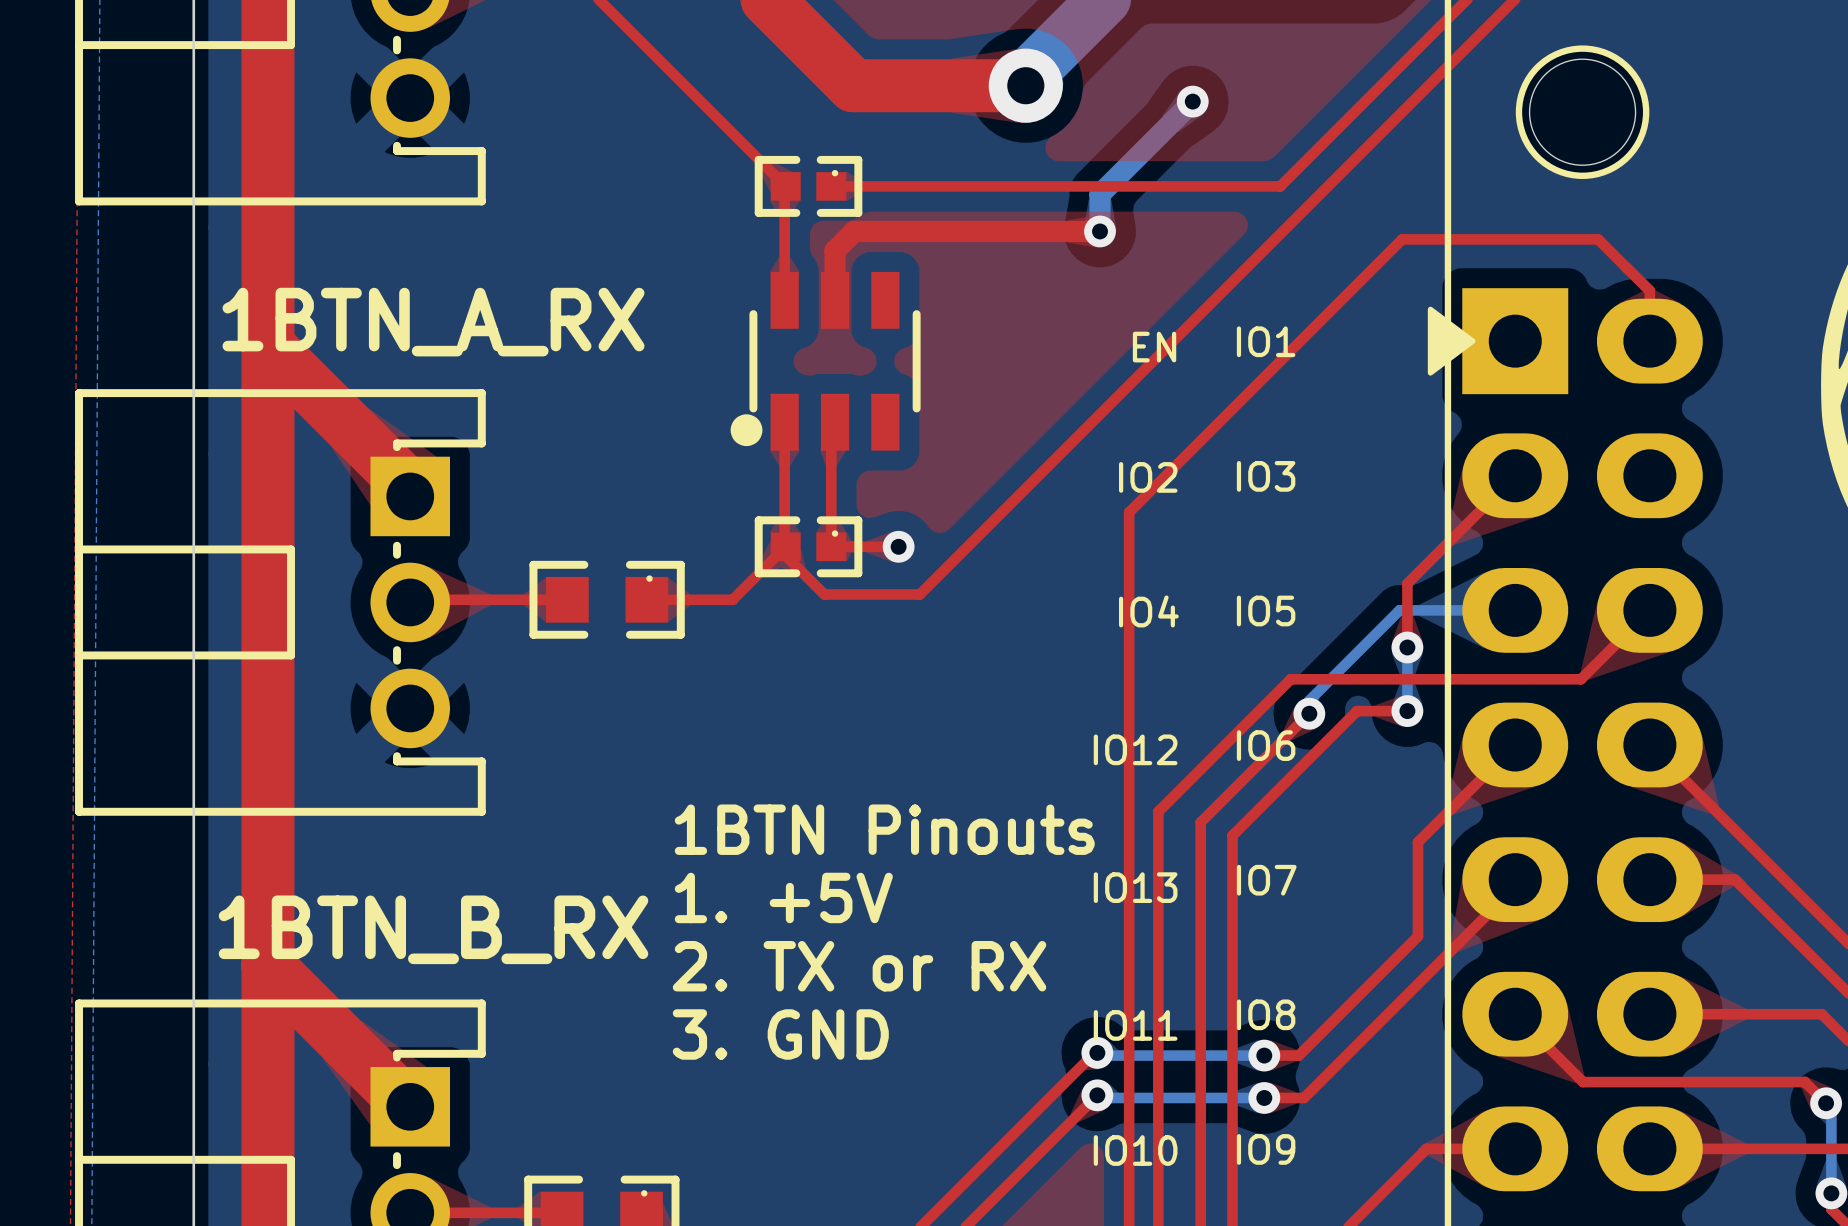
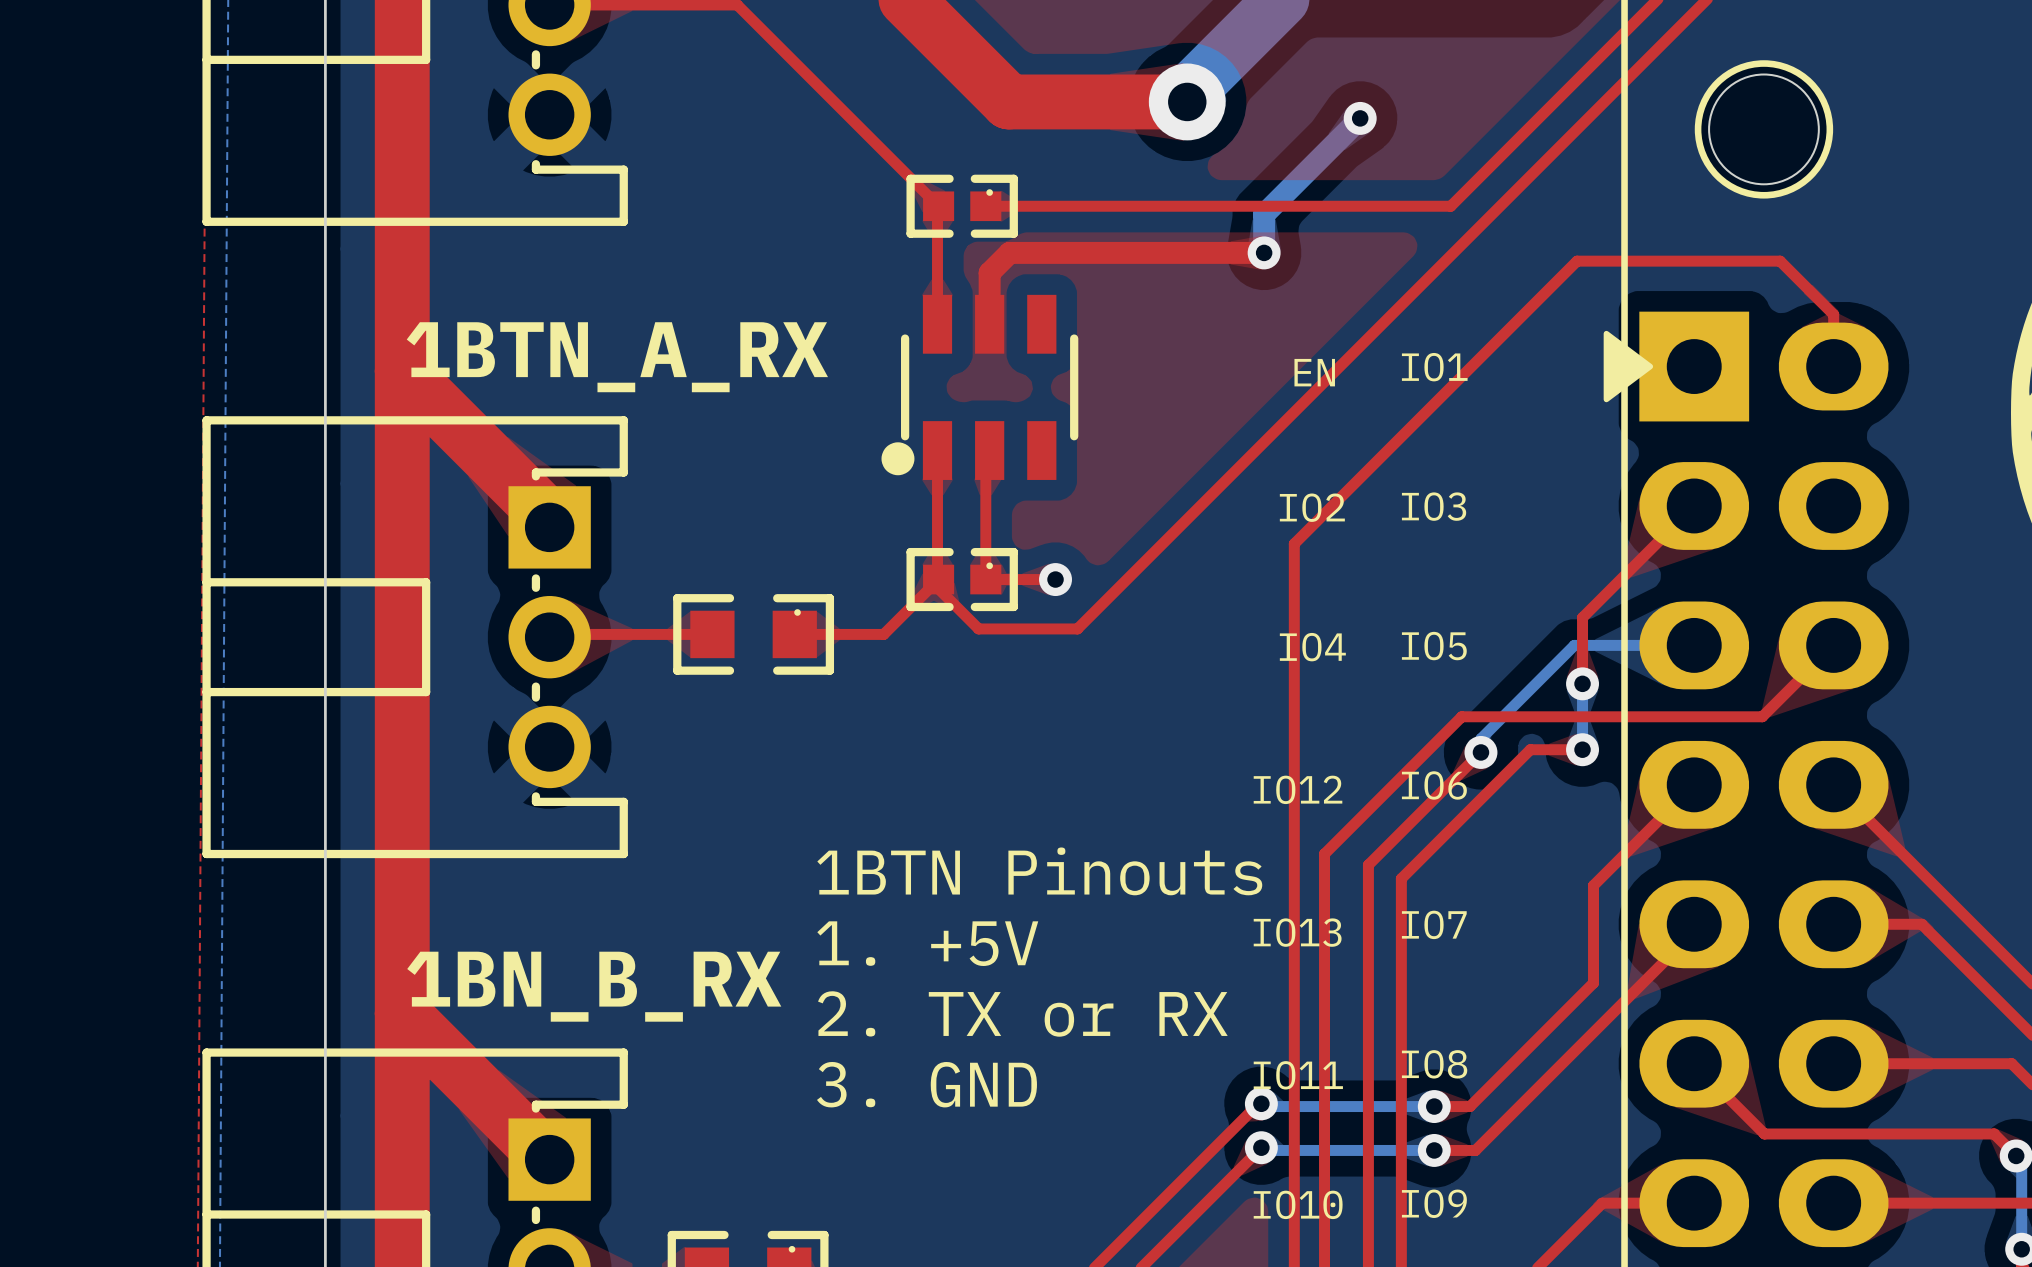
part value position: 1BTN_A_RX (433, 322) -> 1BTN_A_RX (617, 357)
part value: 1BTN_B_RX (433, 929) -> 1BN_B_RX (594, 986)

